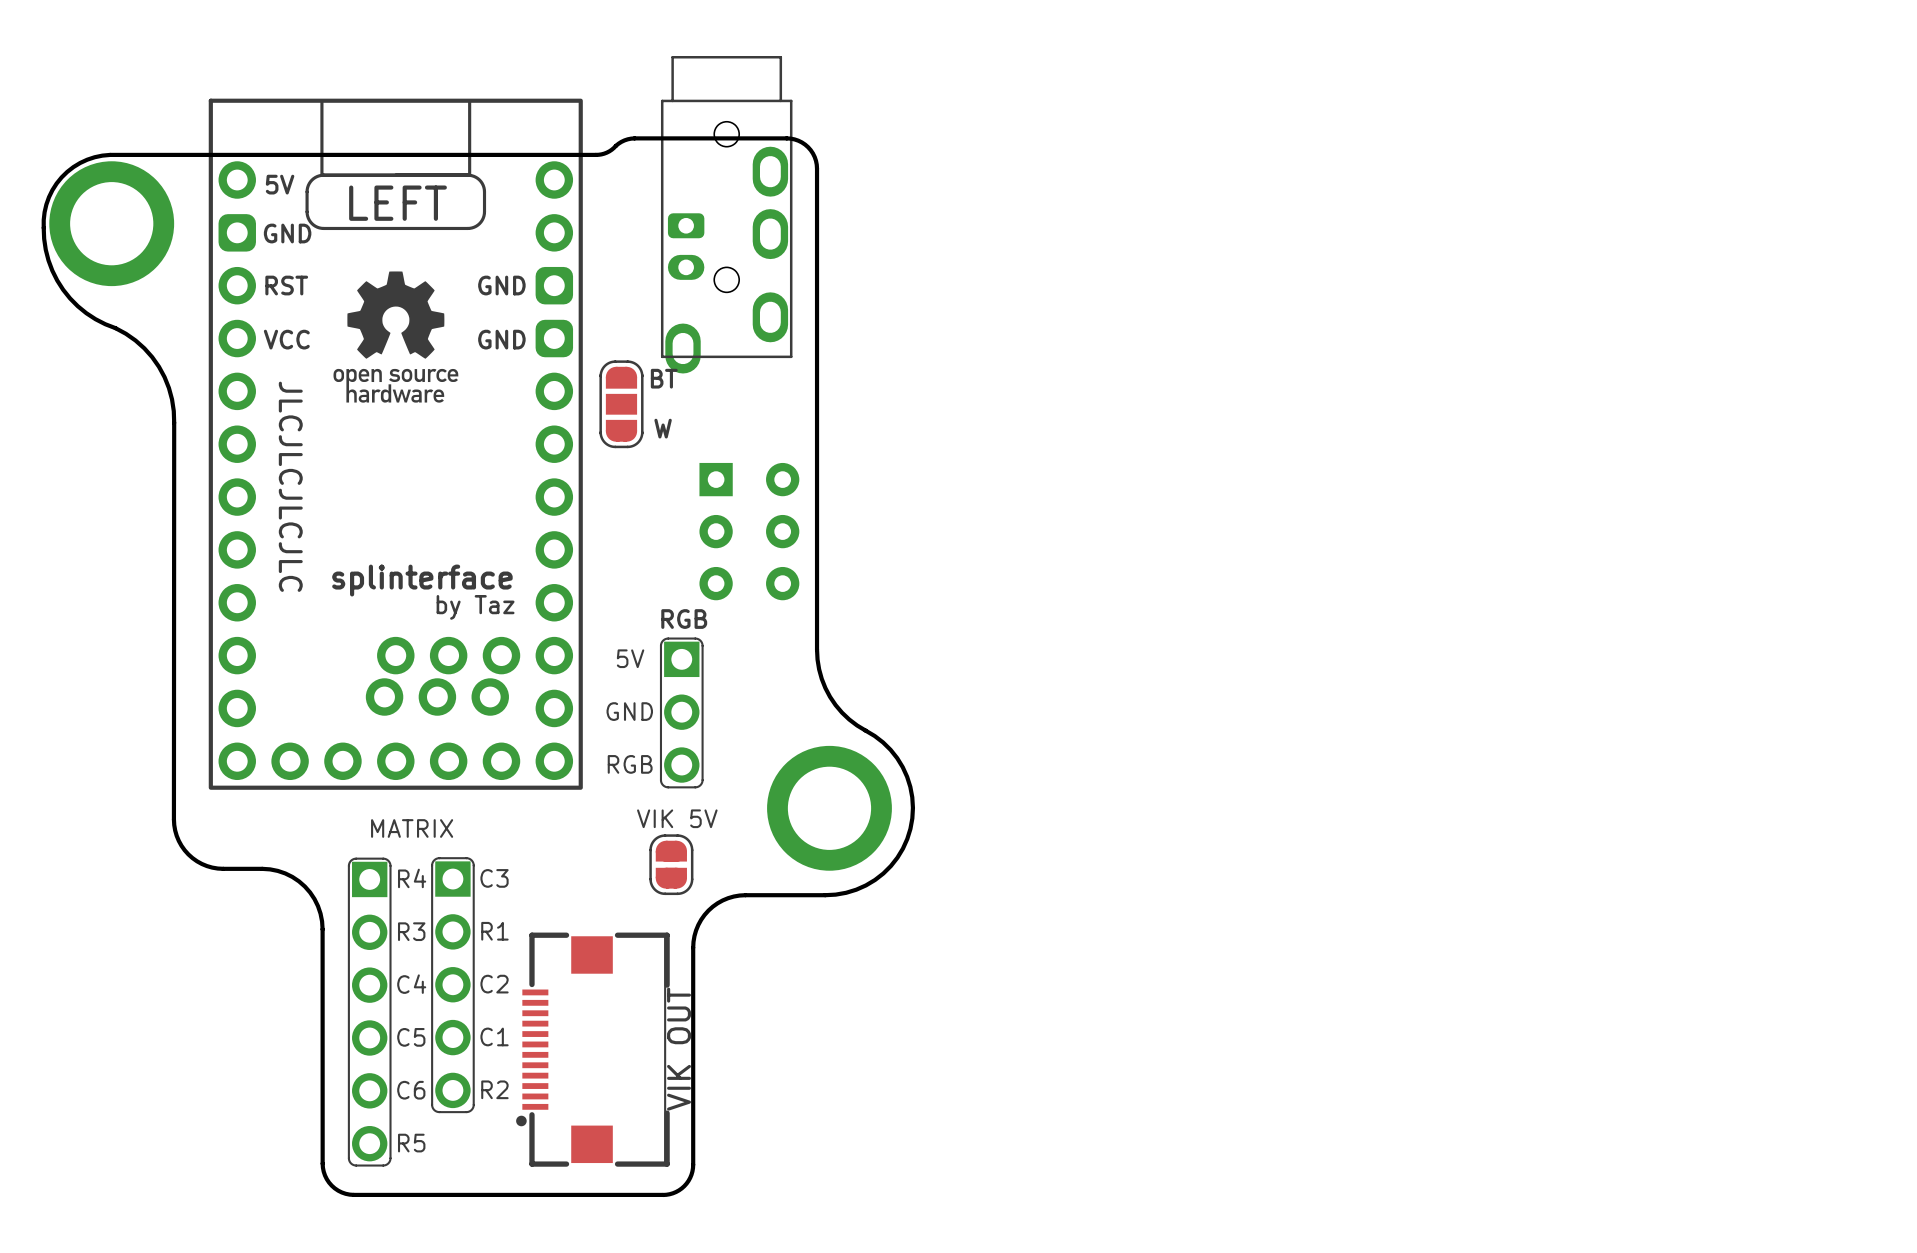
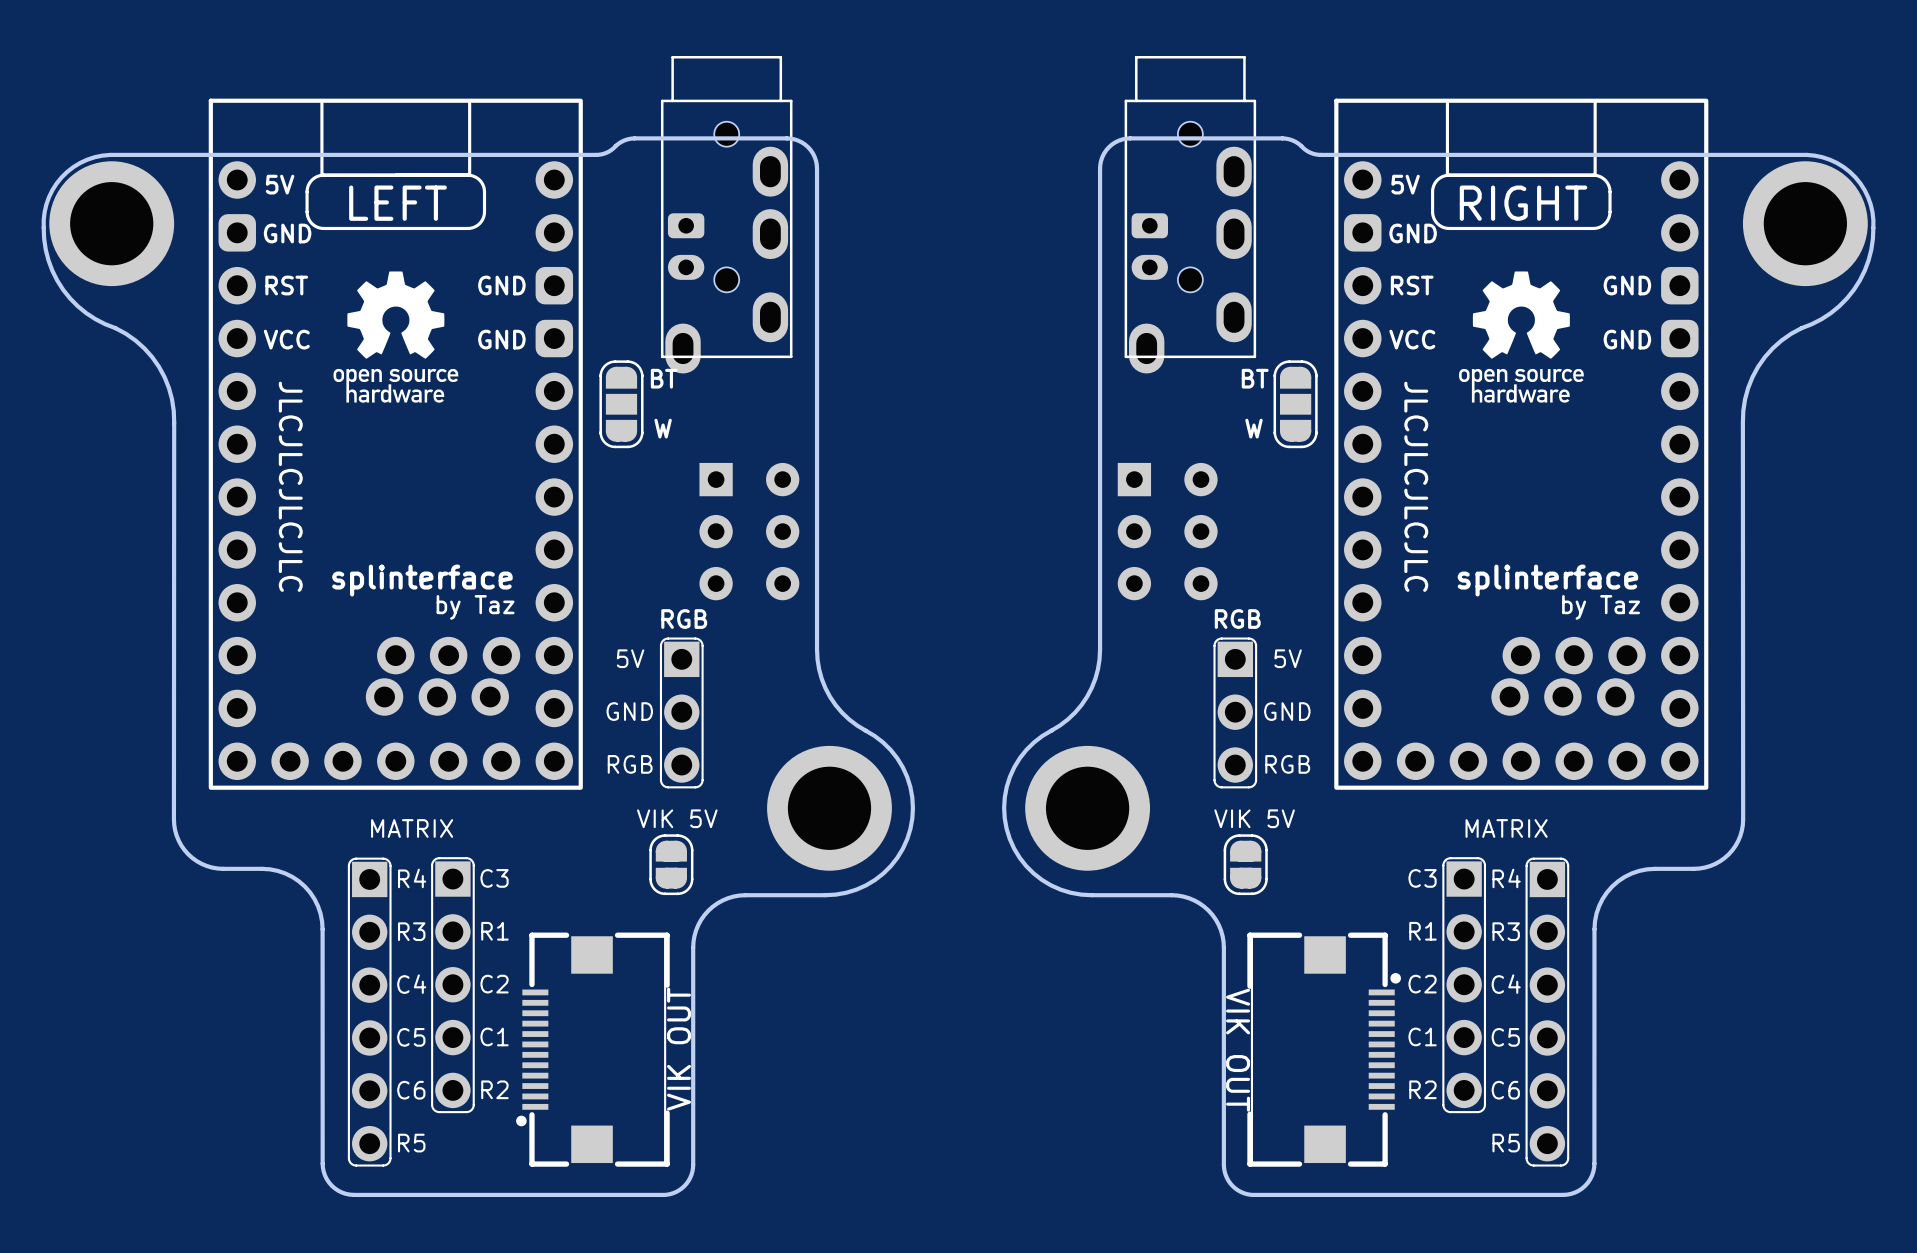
line: none -> (1447, 175) (1593, 175) (1597, 175) (1605, 180) (1609, 187) (1609, 215) (1605, 223) (1595, 228) (1444, 227) (1437, 223) (1433, 216) (1432, 189) (1437, 180) (1442, 176) (1445, 175) (1447, 175) (1449, 175)
text: none -> RIGHT (1523, 203)
part: none -> (1190, 214)
part: none -> (1805, 223)
part: none -> (1149, 246)
drawing: none -> [1459, 271, 1584, 403]
part: none -> (1295, 404)
part: none -> (1521, 444)
text: none -> JLCJLCJLCJLC (1416, 486)
part: none -> (1167, 531)
text: none -> splinterface (1547, 580)
text: none -> by Taz (1601, 607)
text: none -> RGB (1237, 619)
part: none -> (1235, 712)
part: none -> (1087, 808)
text: none -> VIK 5V (1254, 818)
text: none -> MATRIX (1506, 828)
part: none -> (1245, 864)
part: none -> (1464, 985)
part: none -> (1547, 1012)
part: none -> (1324, 1049)
board edge: none -> (1254, 1194) (1563, 1194) (1578, 1190) (1590, 1179) (1594, 1163) (1594, 929) (1599, 906) (1612, 886) (1631, 873) (1646, 869) (1699, 868) (1715, 863) (1732, 850) (1741, 830) (1743, 411) (1752, 377) (1764, 357) (1791, 333) (1821, 319) (1839, 306) (1853, 289) (1864, 270) (1872, 238) (1873, 220) (1870, 204) (1864, 190) (1855, 177) (1836, 163) (1822, 157) (1806, 154) (1318, 154) (1307, 151) (1292, 140) (1282, 138) (1126, 138) (1111, 144) (1104, 153) (1100, 168) (1099, 659) (1091, 688) (1081, 705) (1067, 719) (1033, 742) (1014, 767) (1006, 786) (1004, 818) (1009, 838) (1019, 857) (1033, 873) (1051, 885) (1081, 894) (1183, 896) (1199, 903) (1215, 919) (1220, 930) (1223, 947) (1224, 1168) (1228, 1180) (1235, 1188) (1244, 1193) (1254, 1194)

